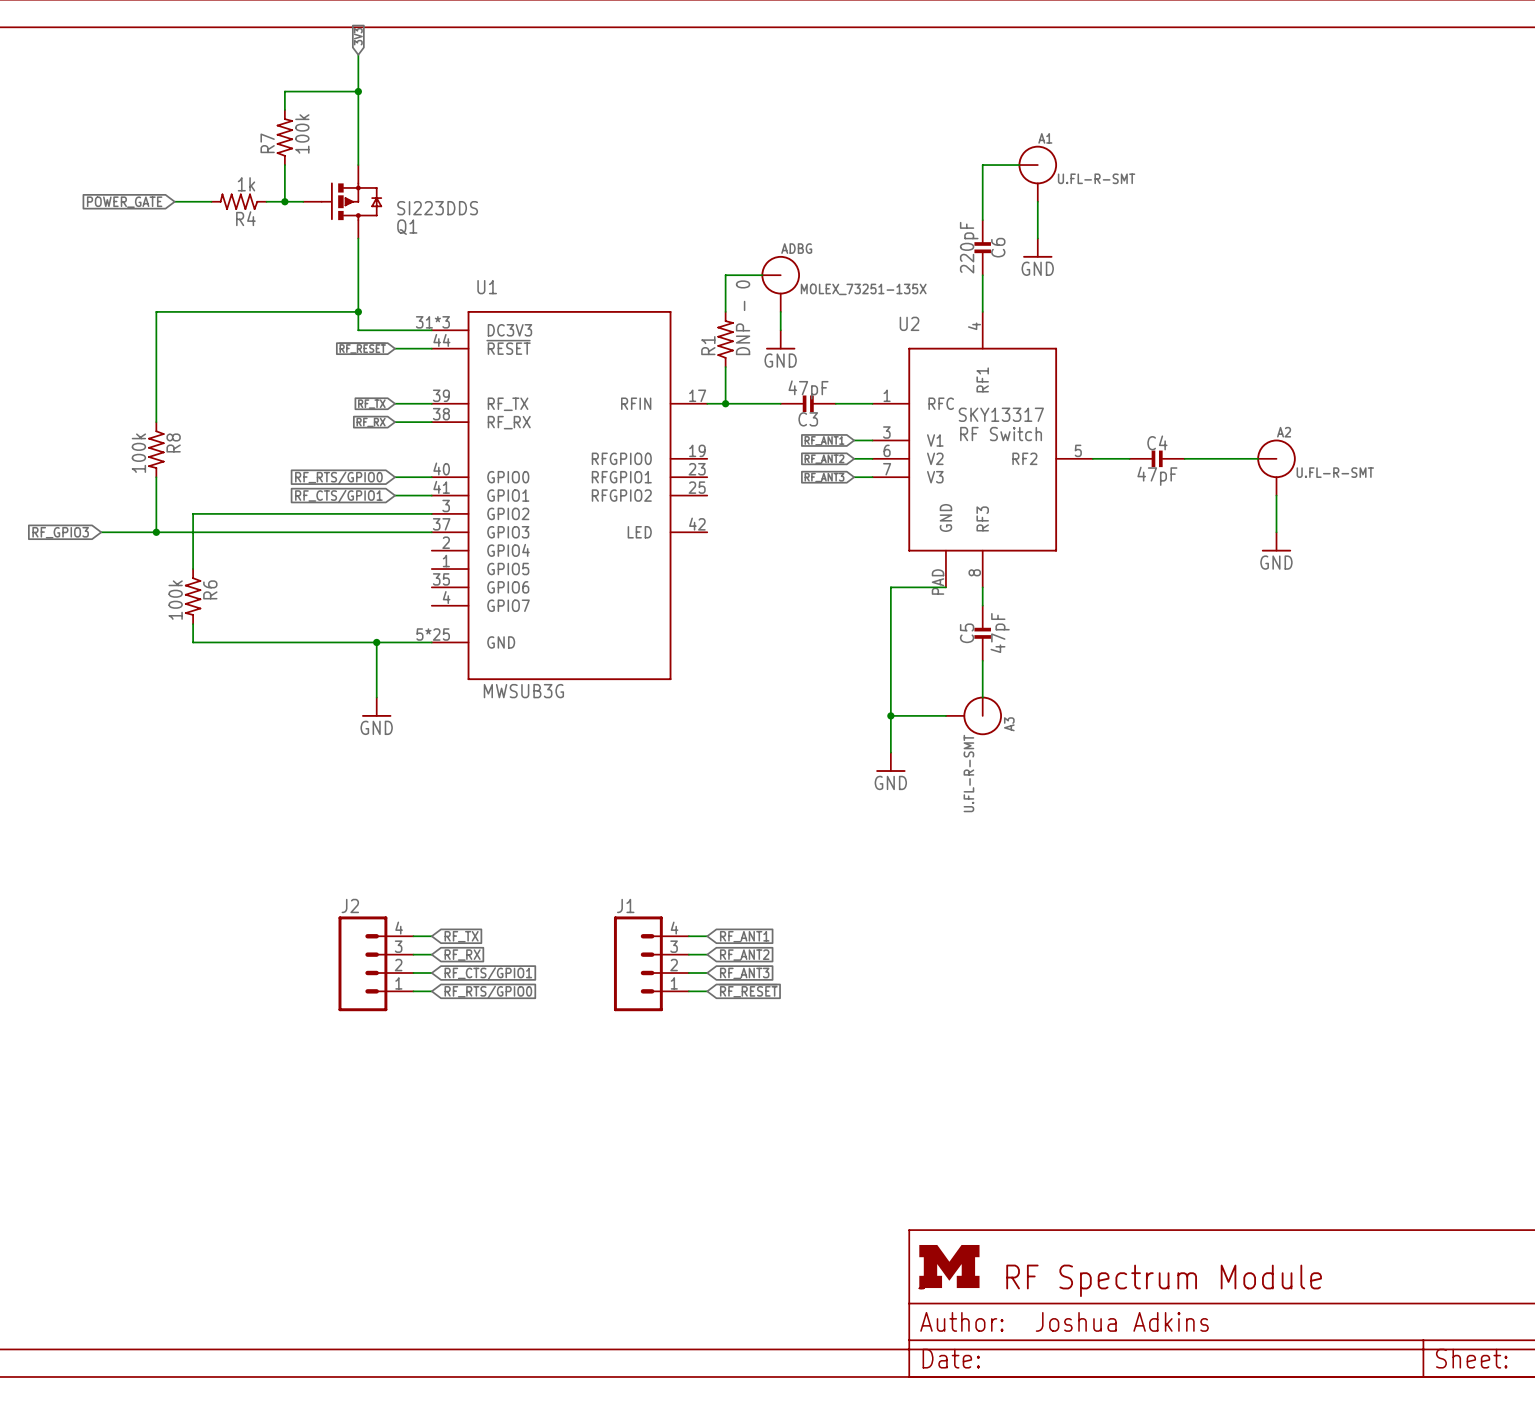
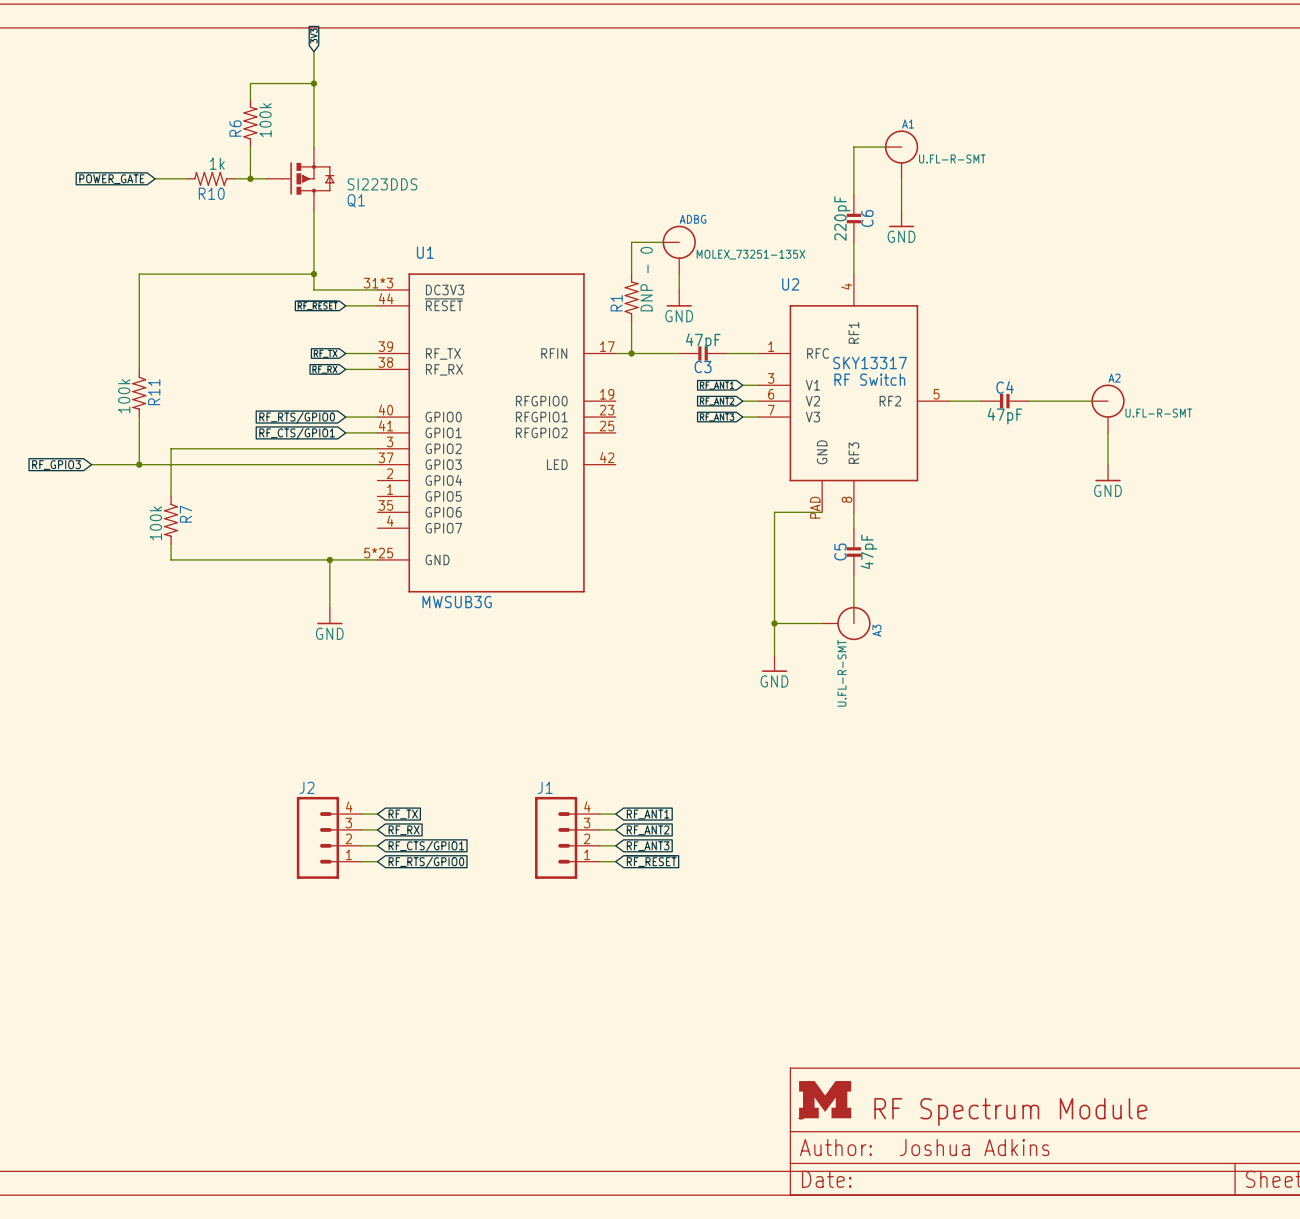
R7 name: R7 (267, 143) -> R6 (235, 128)
R4 name: R4 (245, 218) -> R10 (211, 193)
R8 name: R8 (173, 442) -> R11 (154, 392)
R6 name: R6 (210, 589) -> R7 (185, 514)

